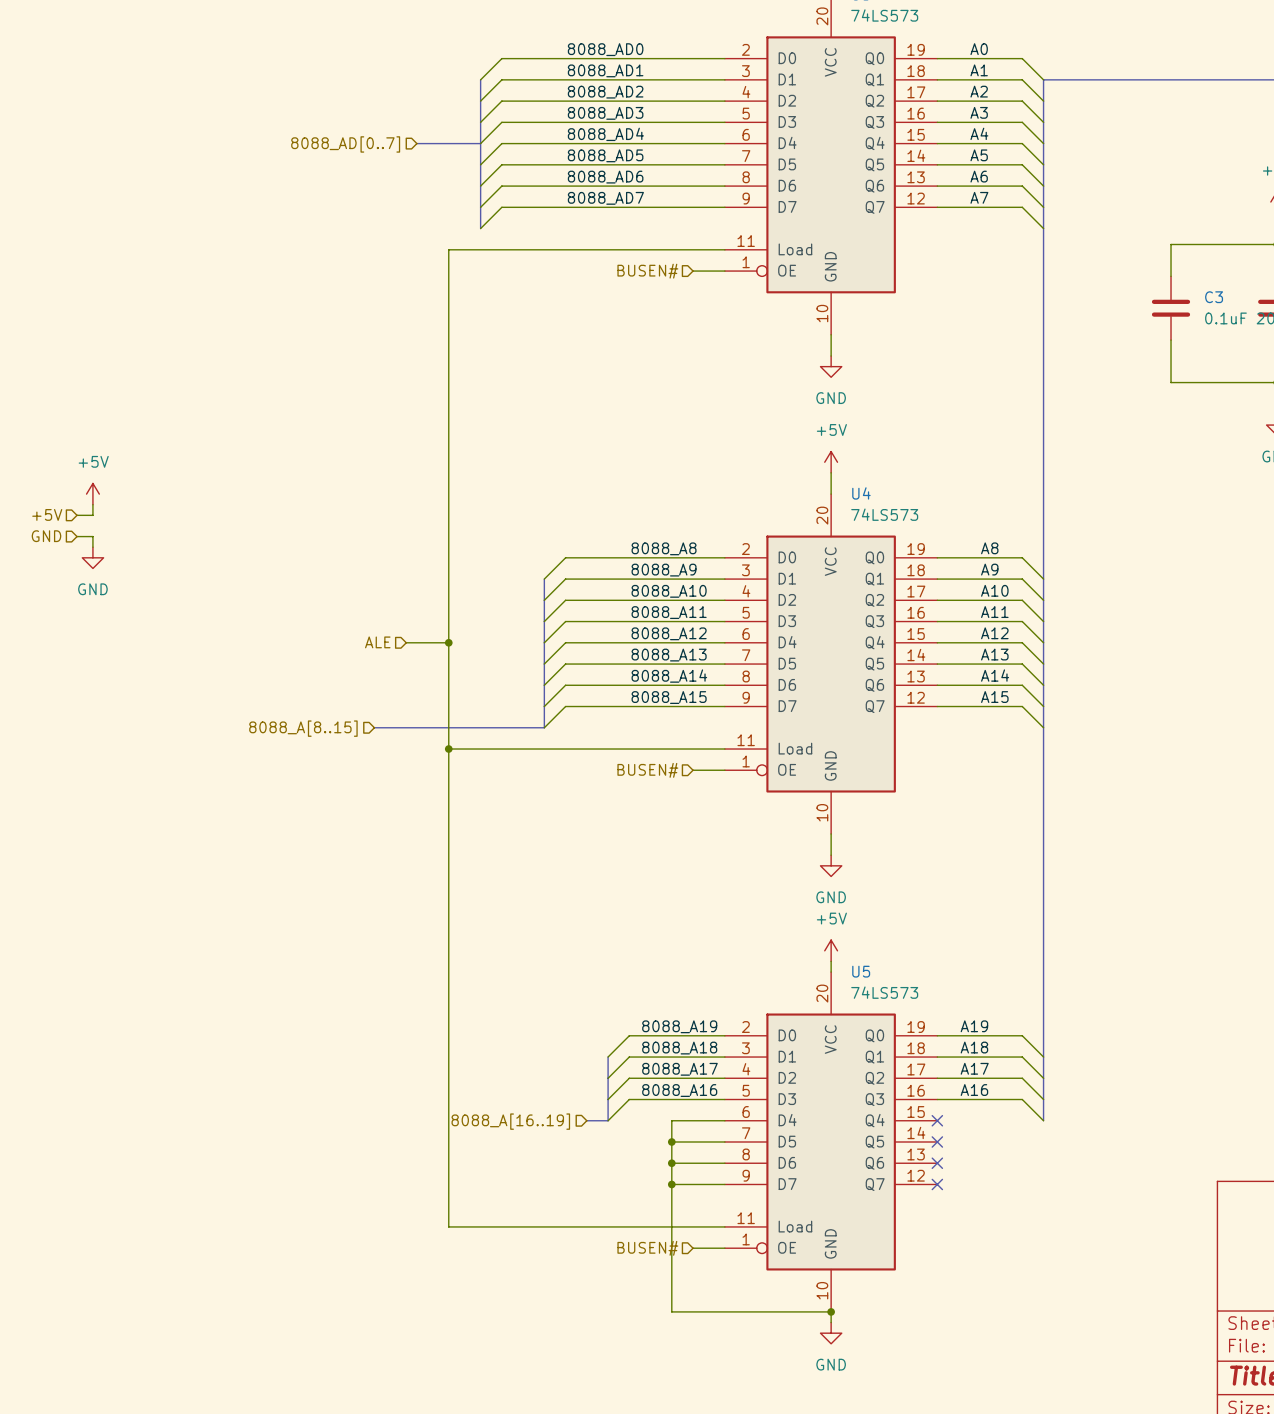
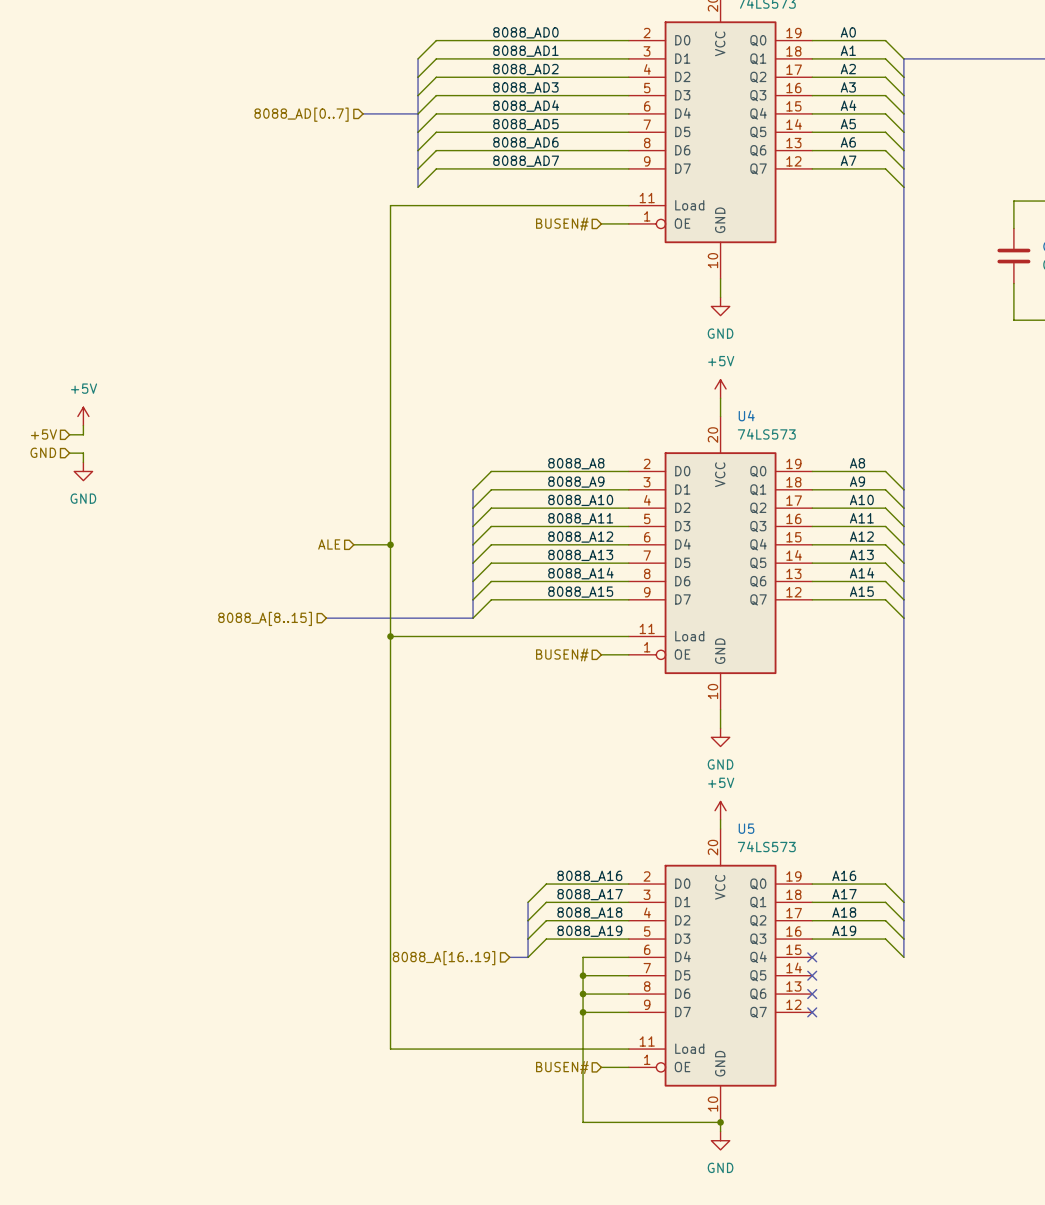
label: 8088_A19 (679, 1026) -> 8088_A16 (589, 876)
label: A19 (974, 1026) -> A16 (844, 875)
label: A18 (974, 1047) -> A17 (844, 894)
label: 8088_A18 (679, 1048) -> 8088_A17 (590, 894)
label: A17 (974, 1068) -> A18 (844, 912)
label: 8088_A17 (679, 1069) -> 8088_A18 (589, 912)
label: 8088_A16 (679, 1090) -> 8088_A19 (589, 931)
label: A16 (974, 1090) -> A19 (844, 930)

